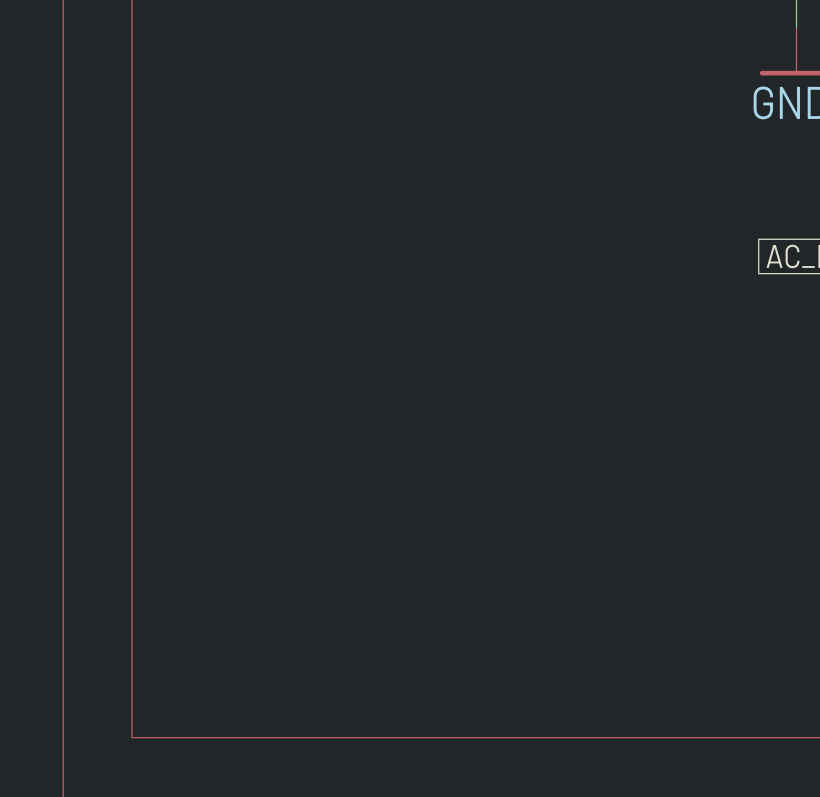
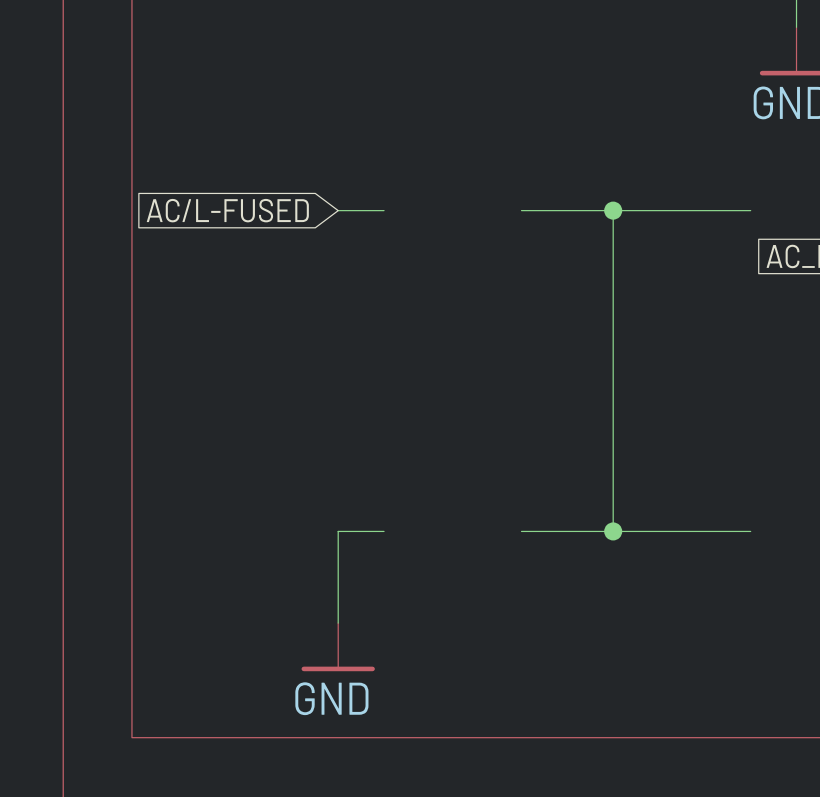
global label: none -> AC/L-FUSED (227, 210)
wire: none -> (338, 210) (384, 210)
wire: none -> (521, 210) (750, 210)
wire: none -> (613, 210) (613, 531)
junction: none -> (613, 210)
wire: none -> (384, 531) (338, 531) (338, 623)
wire: none -> (521, 531) (750, 531)
junction: none -> (613, 531)
power symbol: none -> GND (338, 647)

